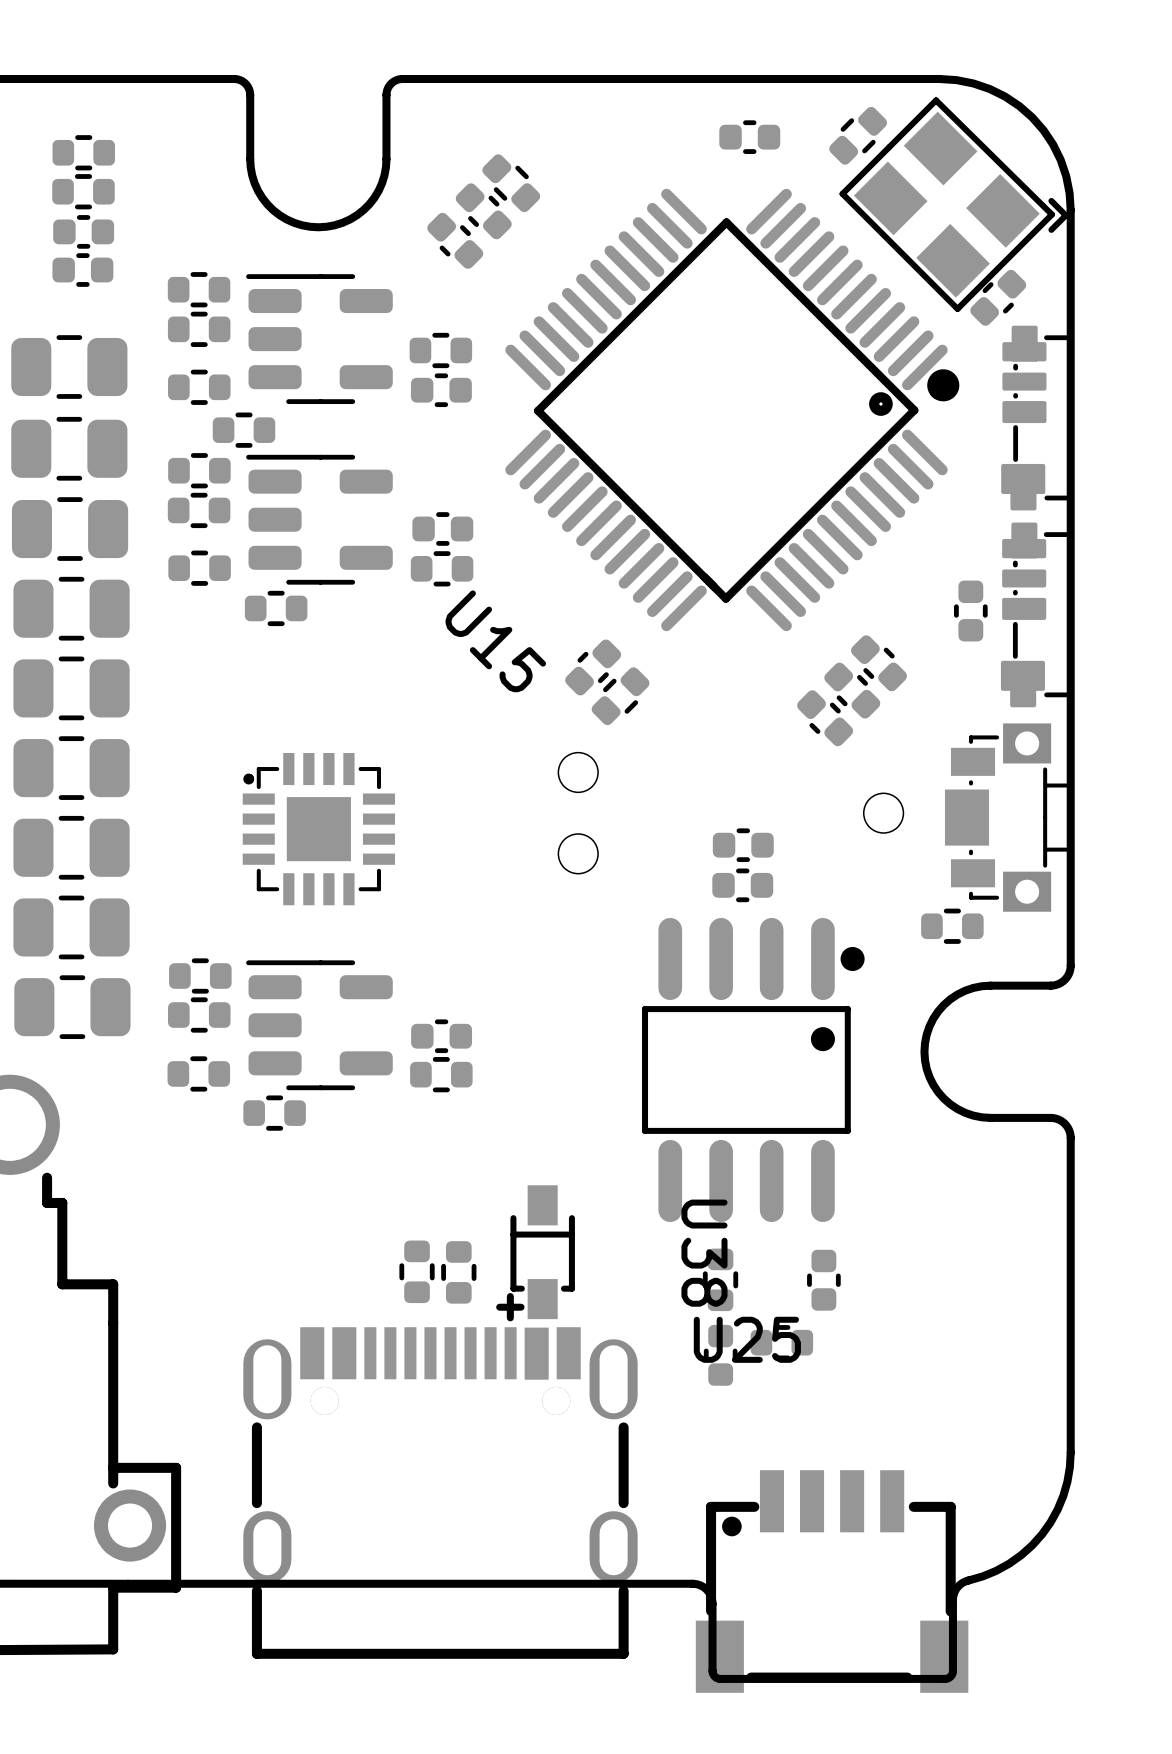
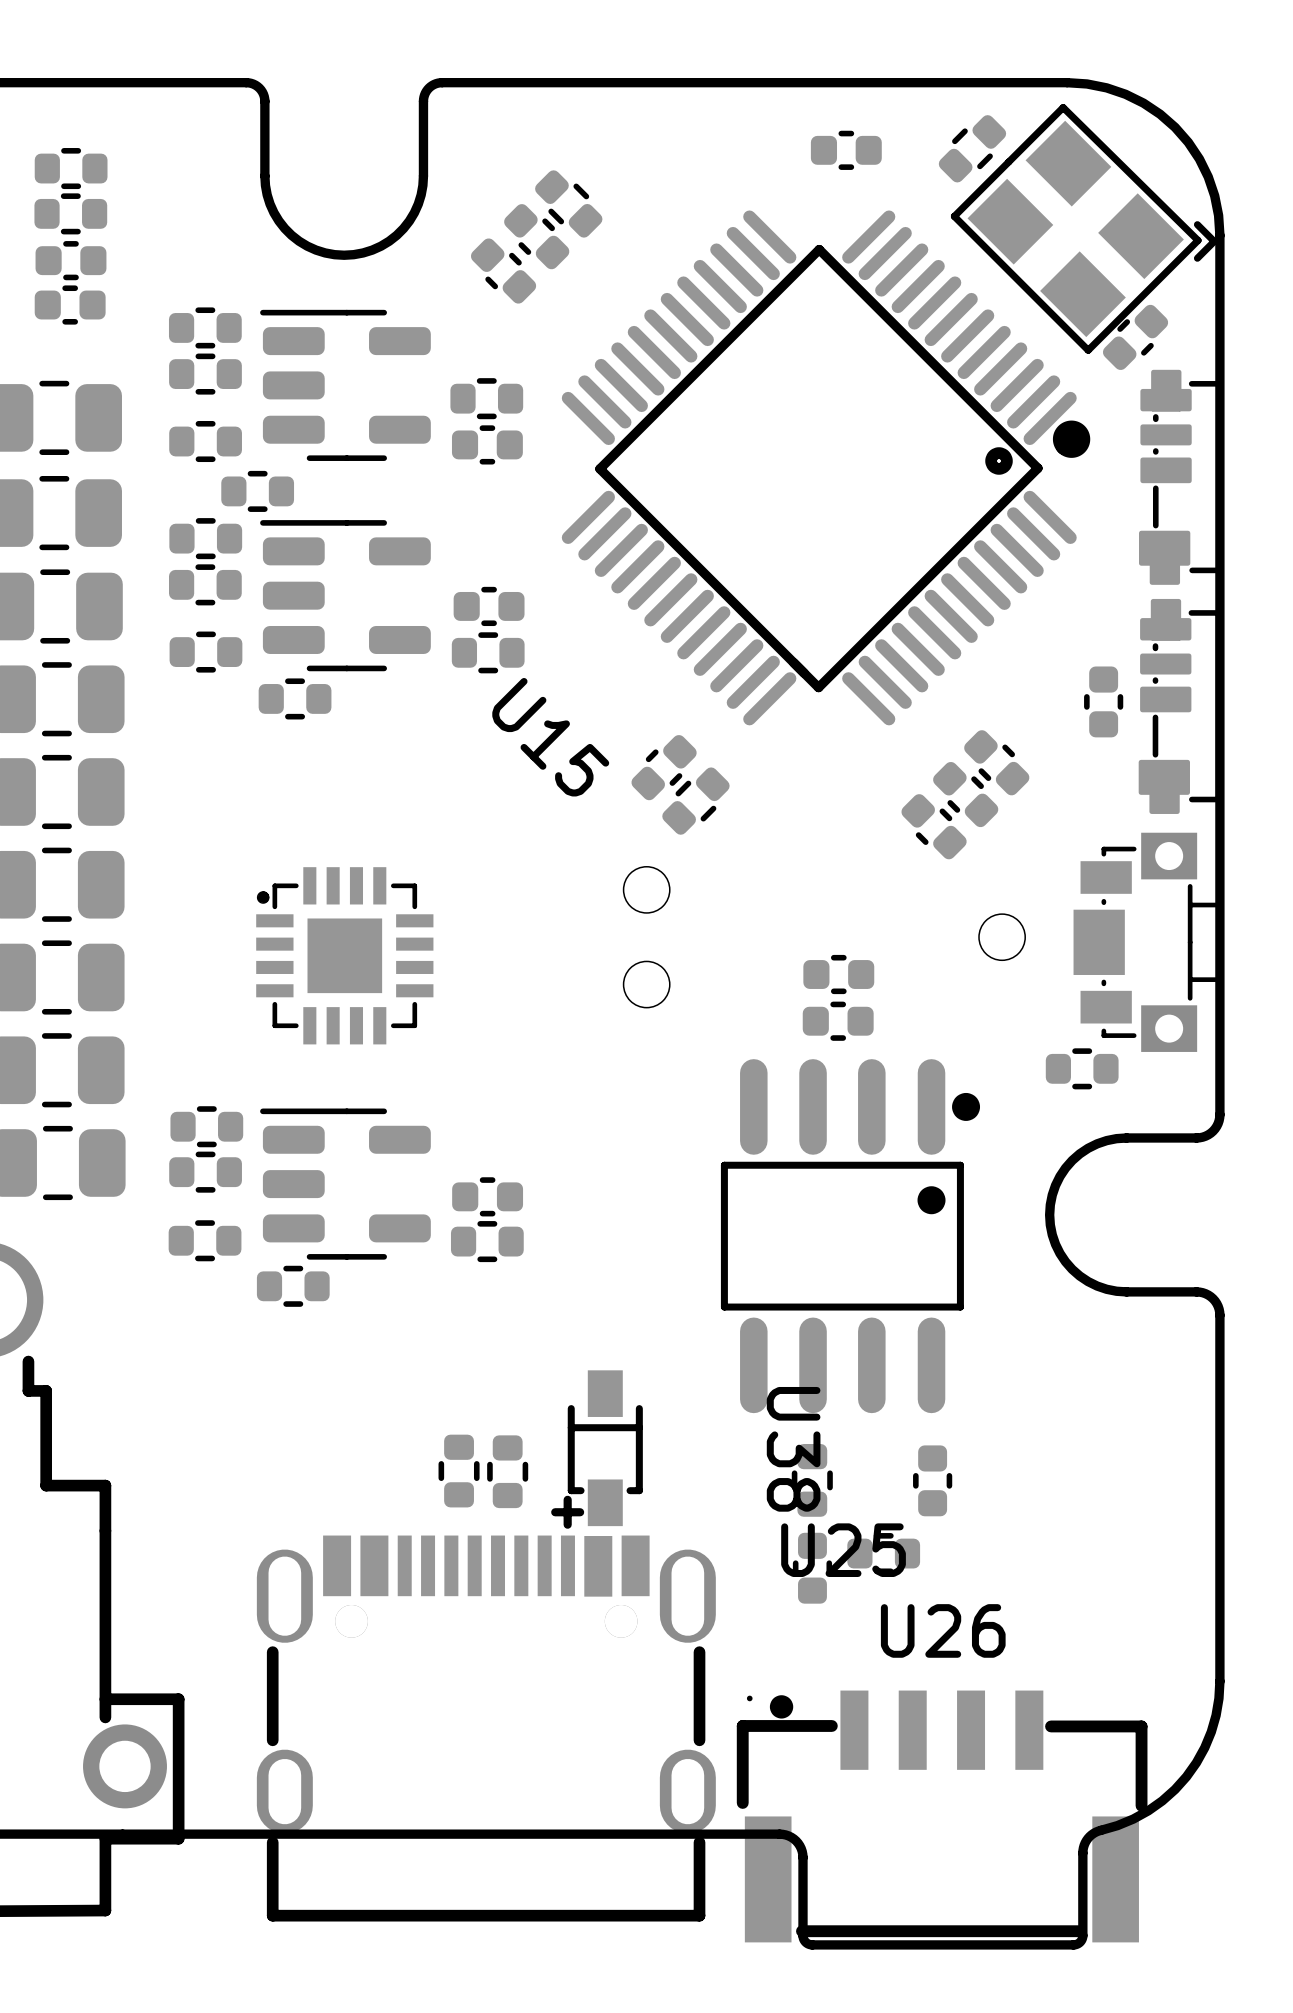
U26: none -> (942, 1816)
part: (832, 1581) -> none

